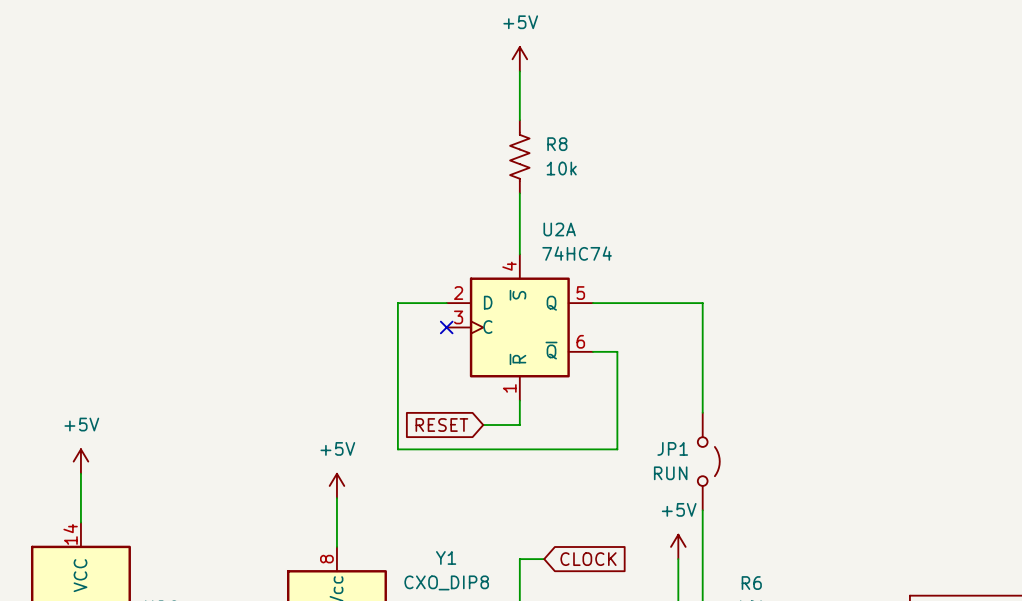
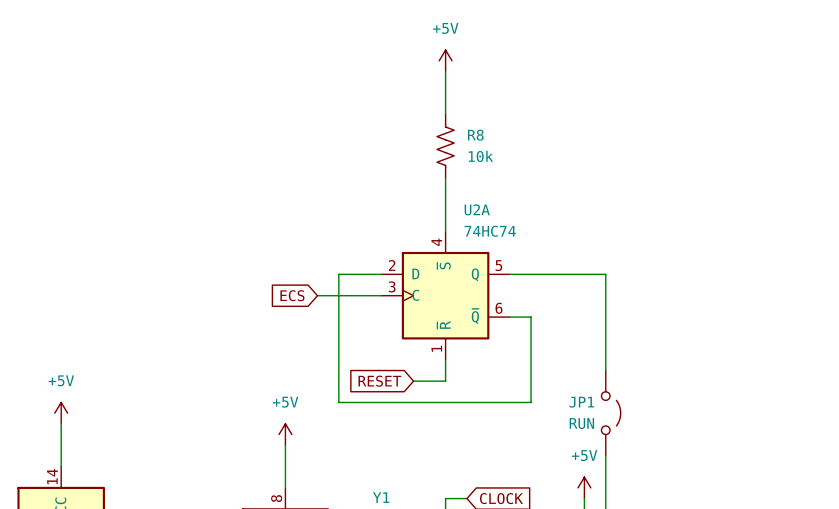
global label: none -> ECS (292, 295)
wire: none -> (317, 295) (381, 295)
no-connect mark: (446, 327) -> none

